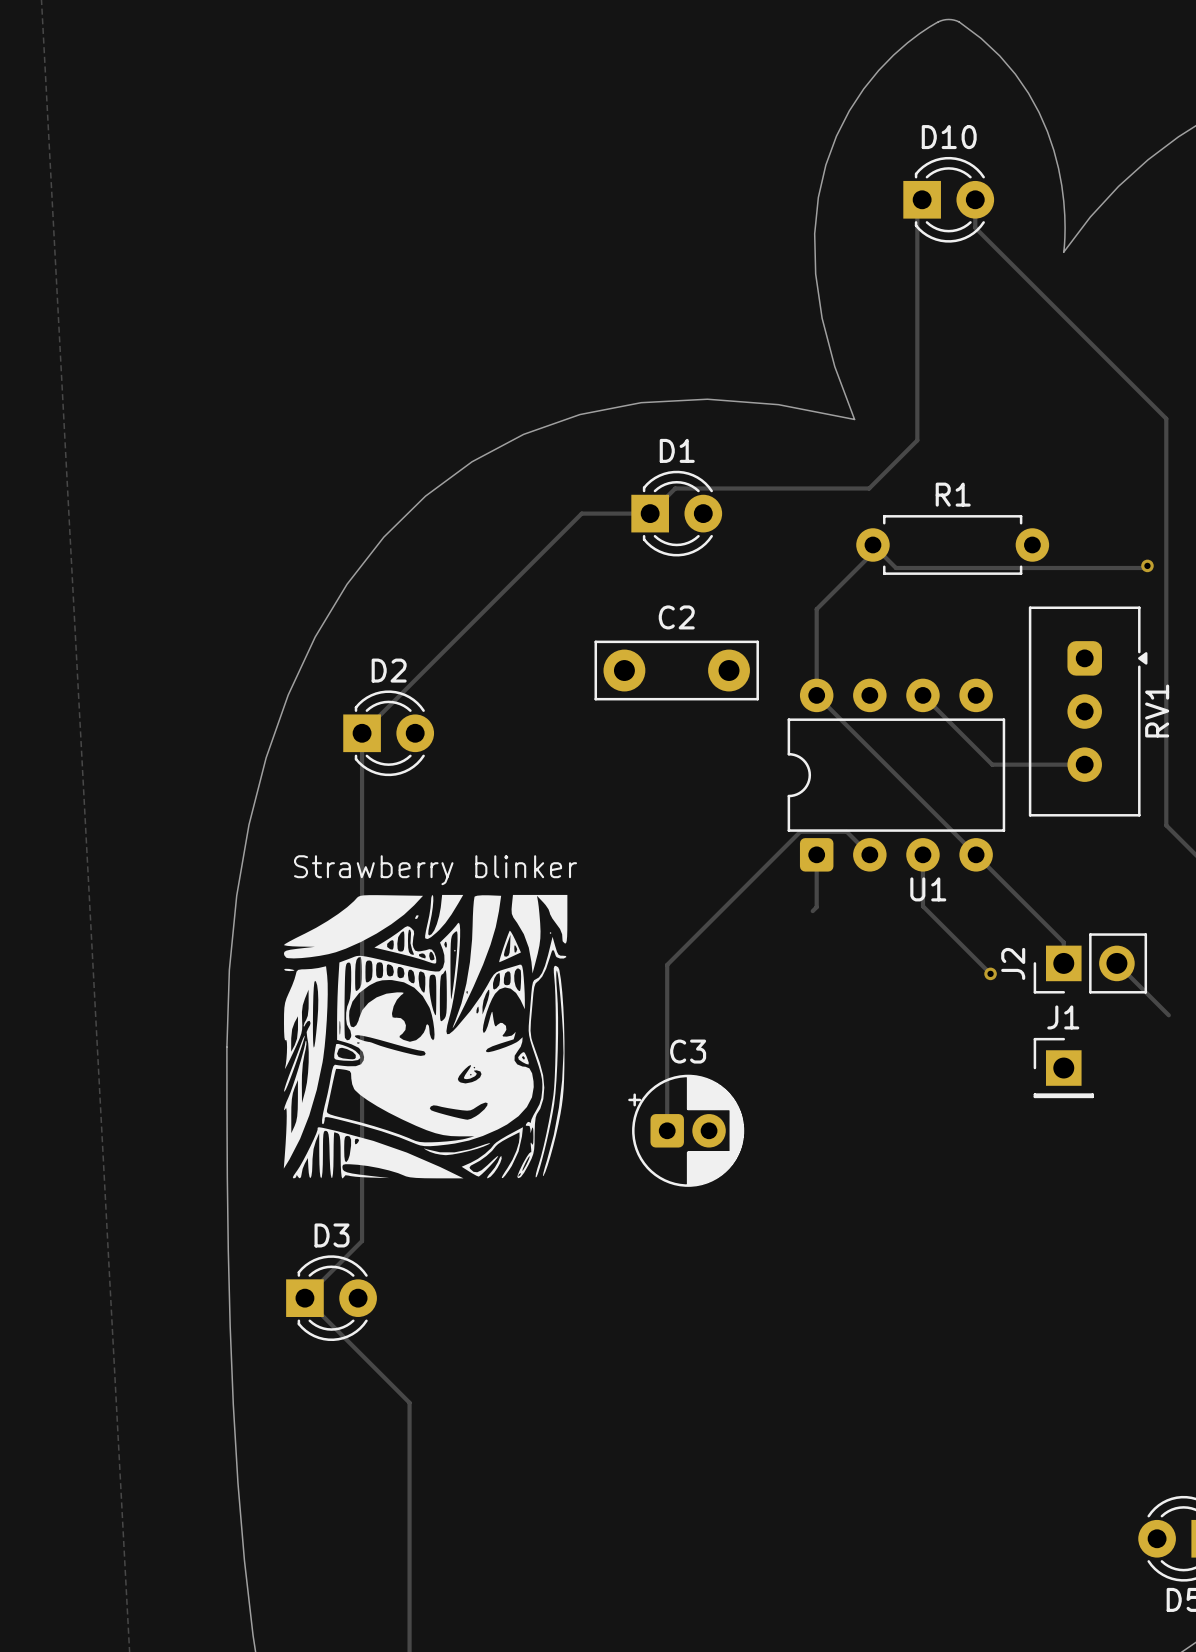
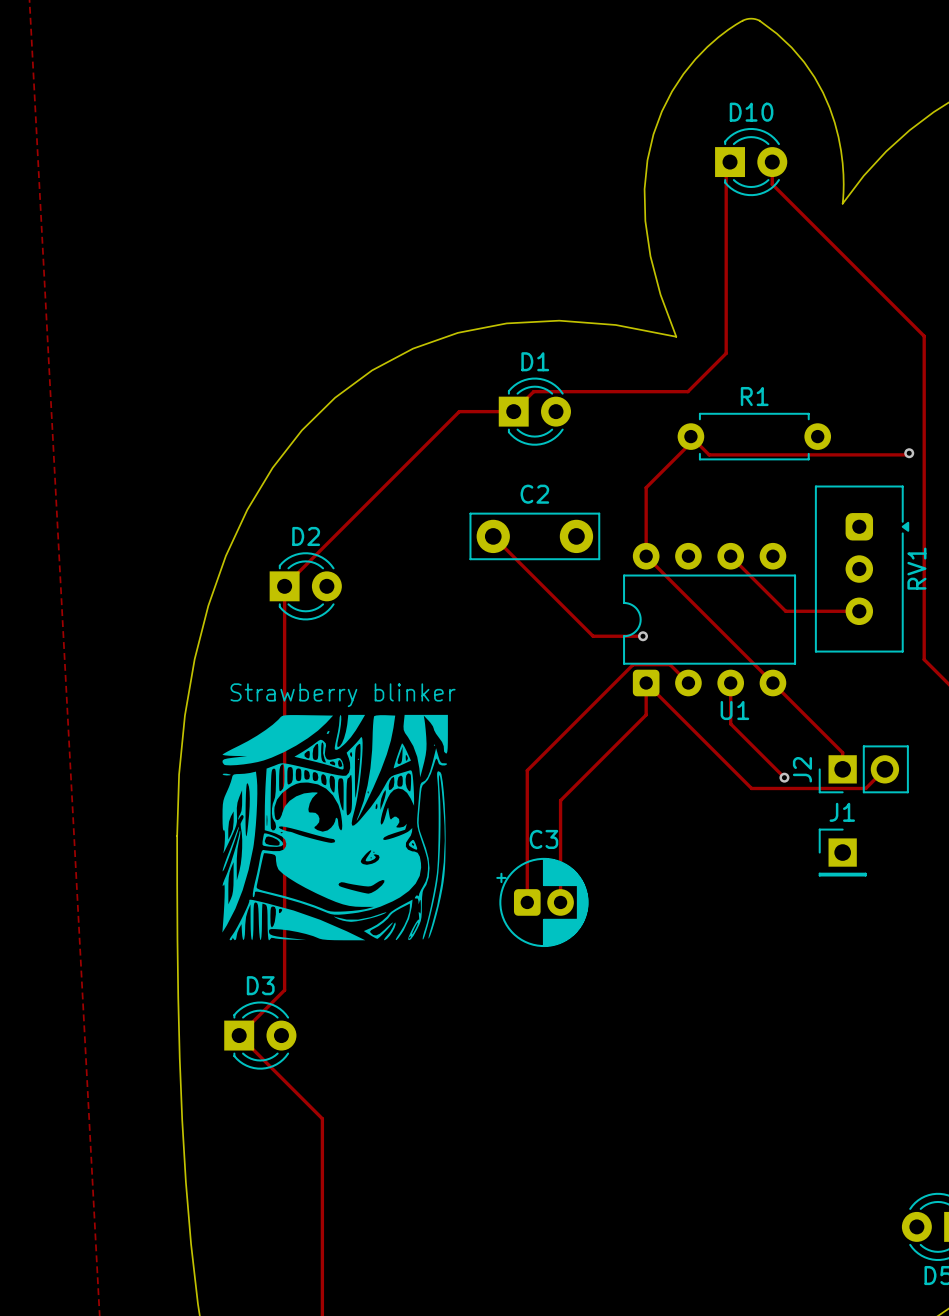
track: none -> (493, 536) (593, 636) (643, 636)
via: none -> (643, 636)
track: (816, 895) (816, 907) (812, 911) -> (646, 714) (560, 800) (560, 902)
track: (1116, 963) (1168, 1015) -> (884, 769) (865, 788) (751, 788) (646, 683)

